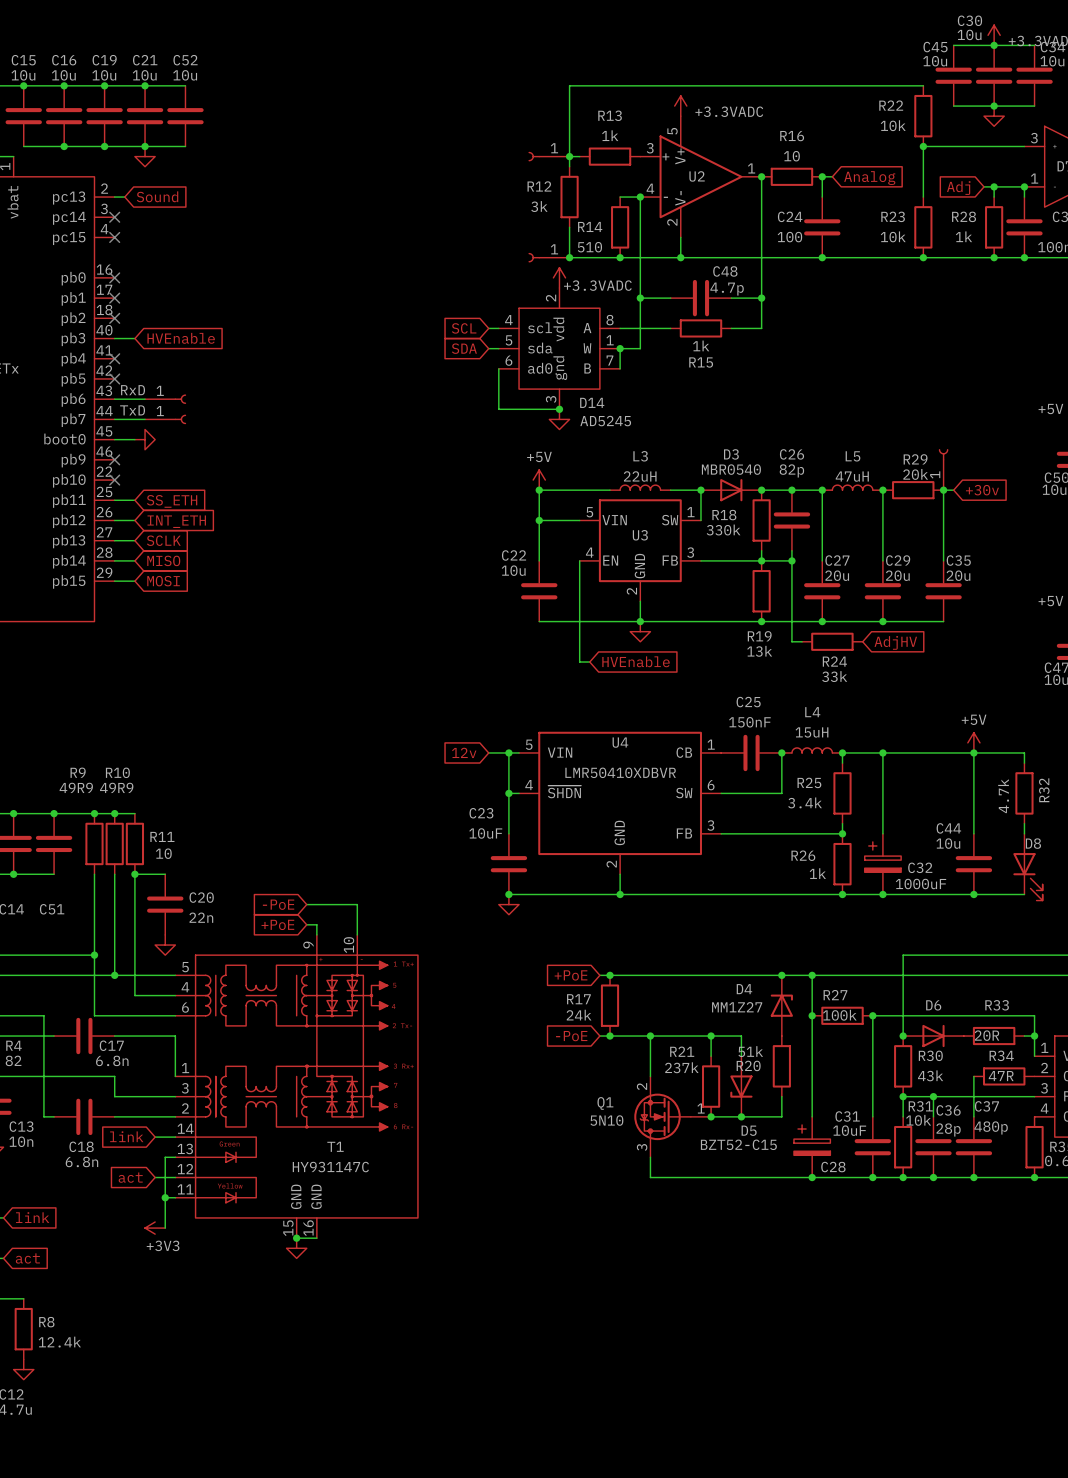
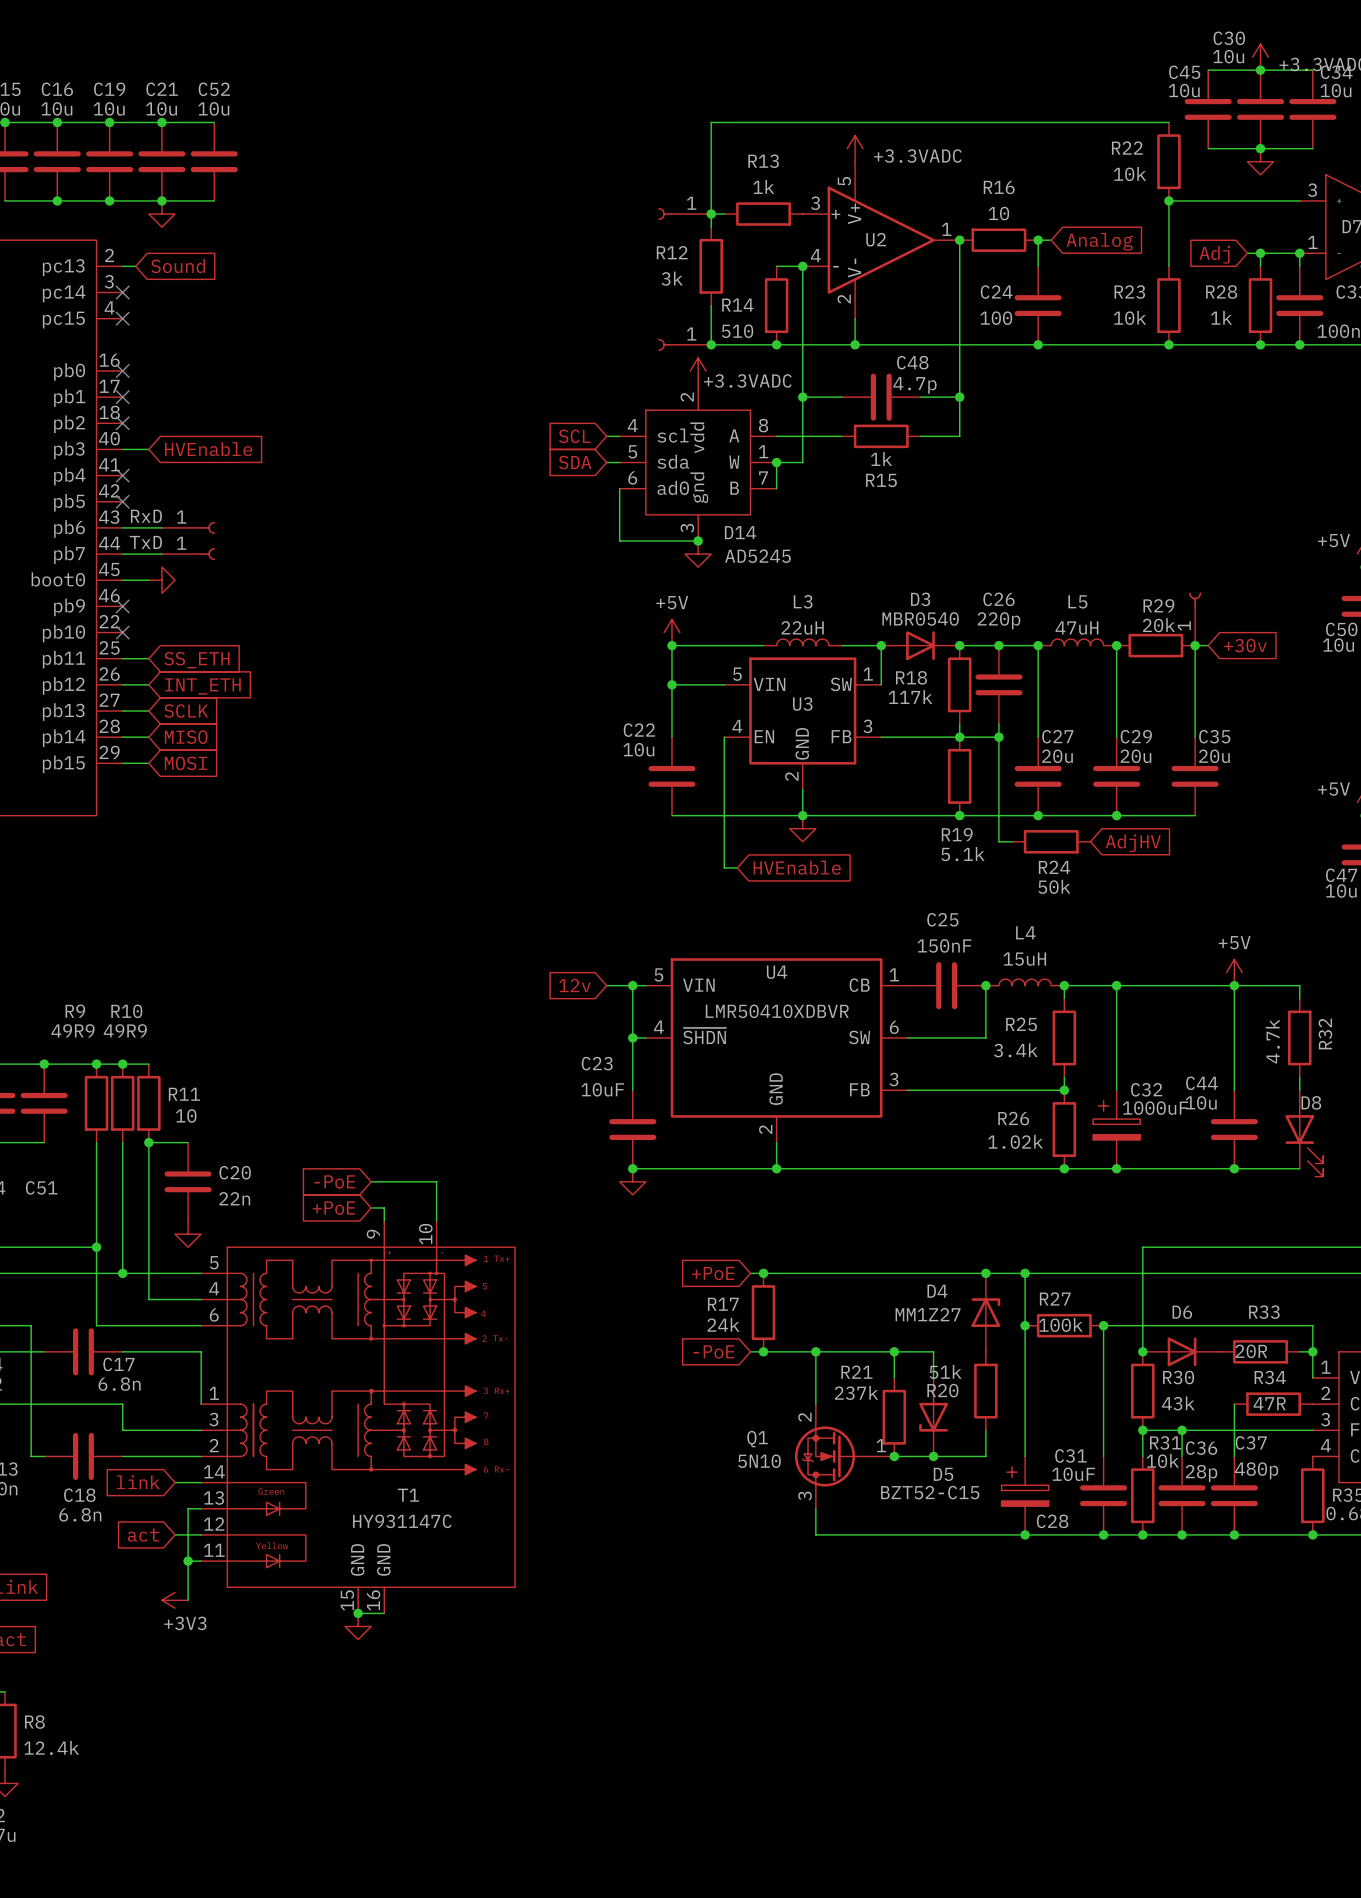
C26 value: 82p (791, 470) -> 220p (998, 620)
R18 value: 330k (723, 530) -> 117k (910, 697)
R19 value: 13k (759, 651) -> 5.1k (963, 854)
R24 value: 33k (834, 676) -> 50k (1054, 886)
C32 name position: C32 (920, 867) -> C32 (1146, 1089)
R26 value: 1k (817, 873) -> 1.02k (1015, 1141)
C32 value position: 1000uF (921, 884) -> 1000uF (1155, 1108)

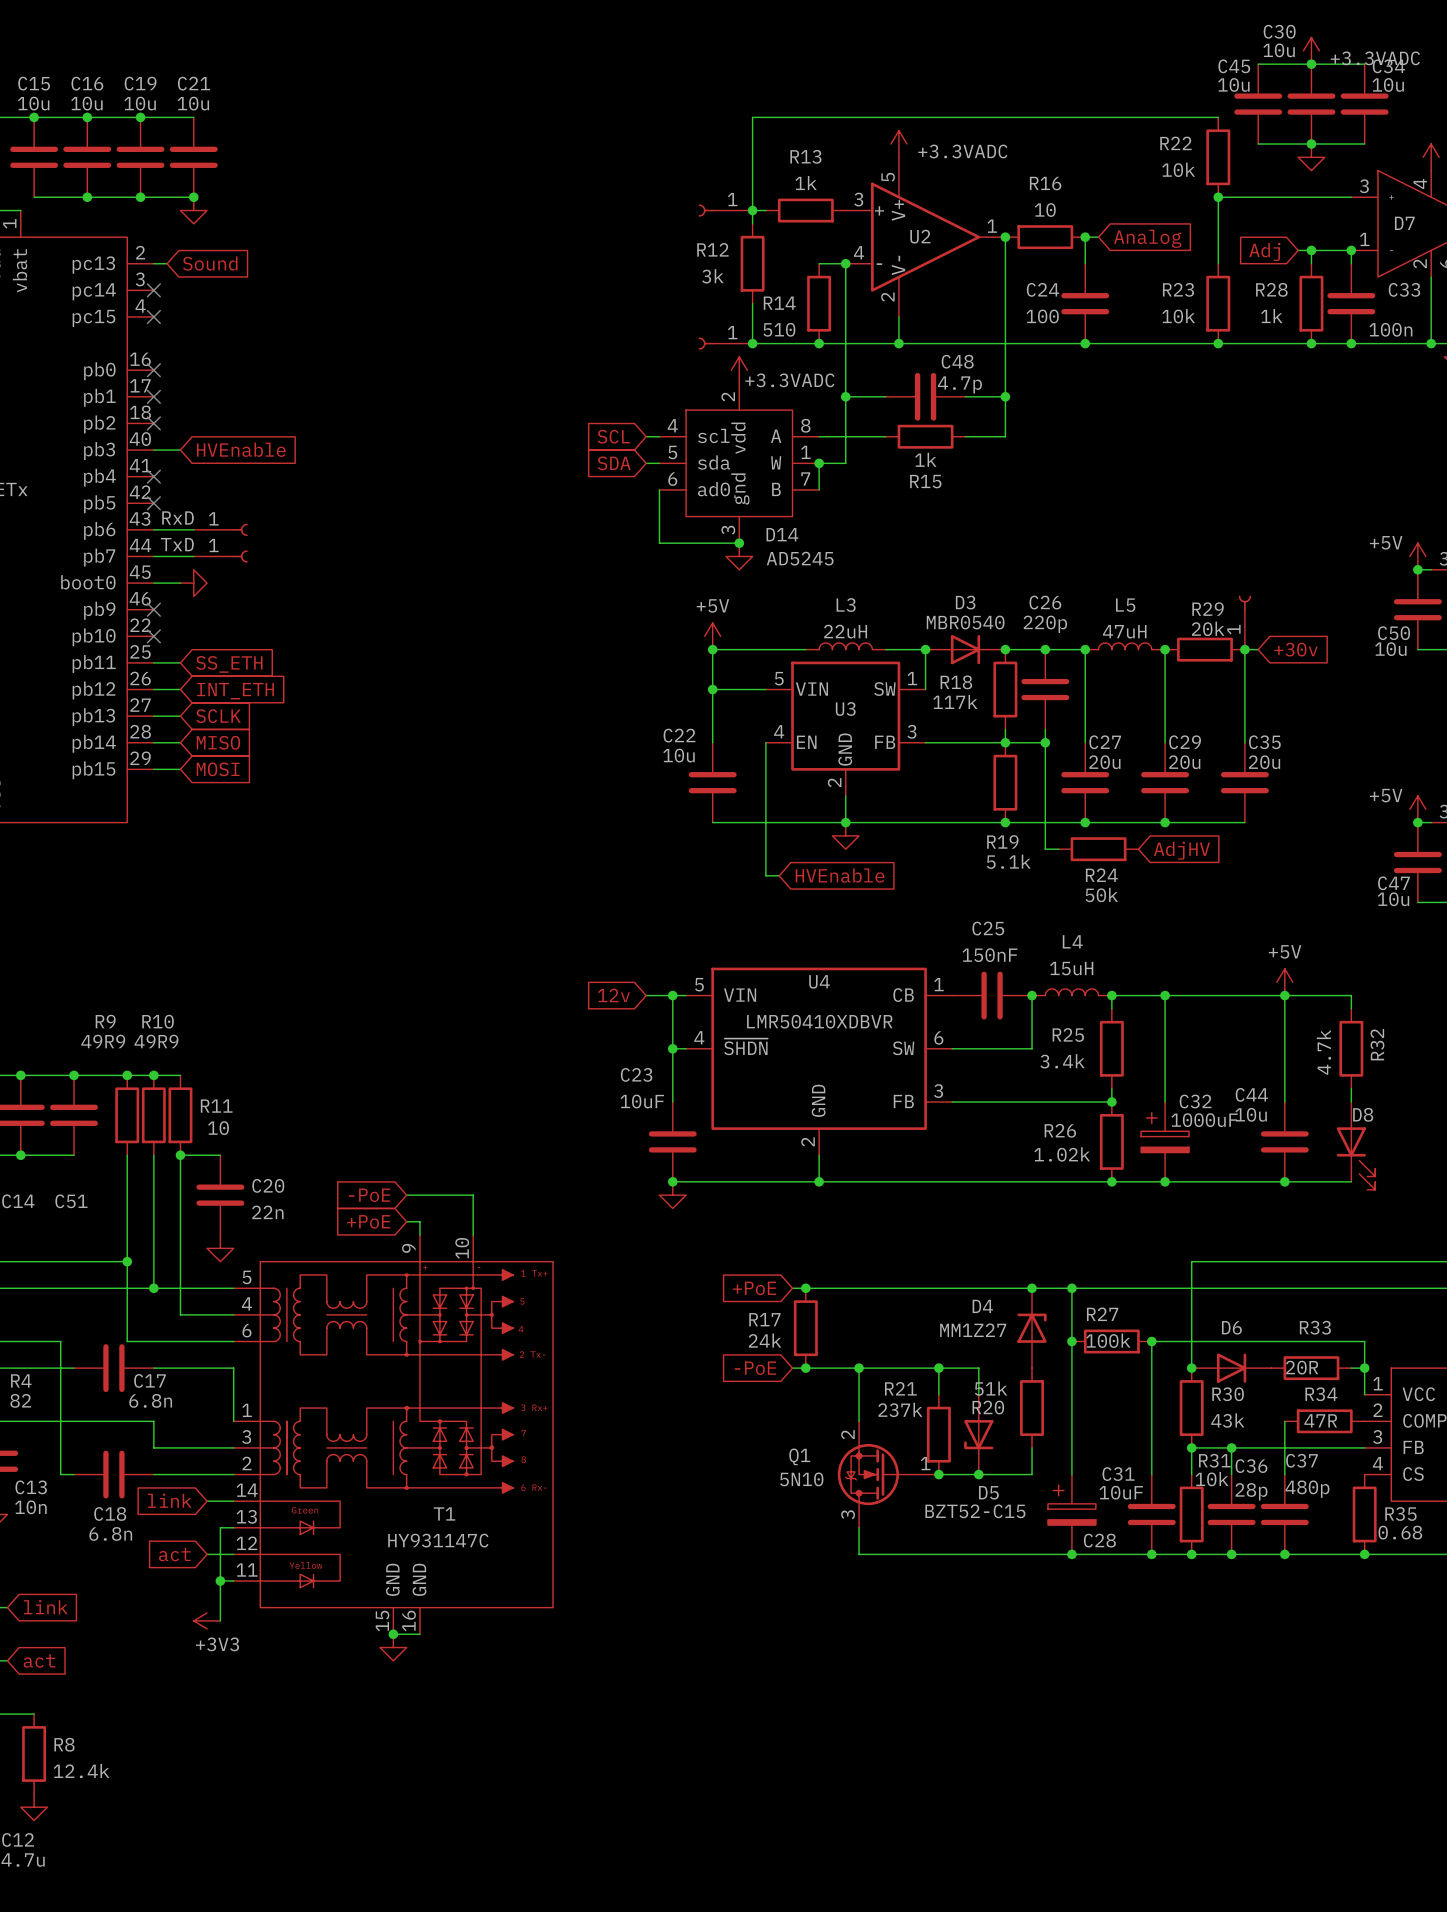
wire: (161, 122) (214, 122) -> none
junction: (161, 122) -> none
C52: 10u (214, 161) -> none
wire: (161, 200) (214, 200) -> none

